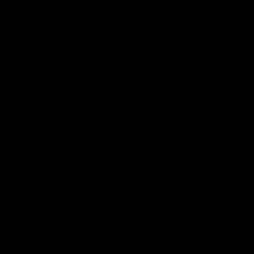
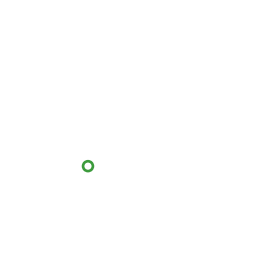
via: none -> (87, 166)

